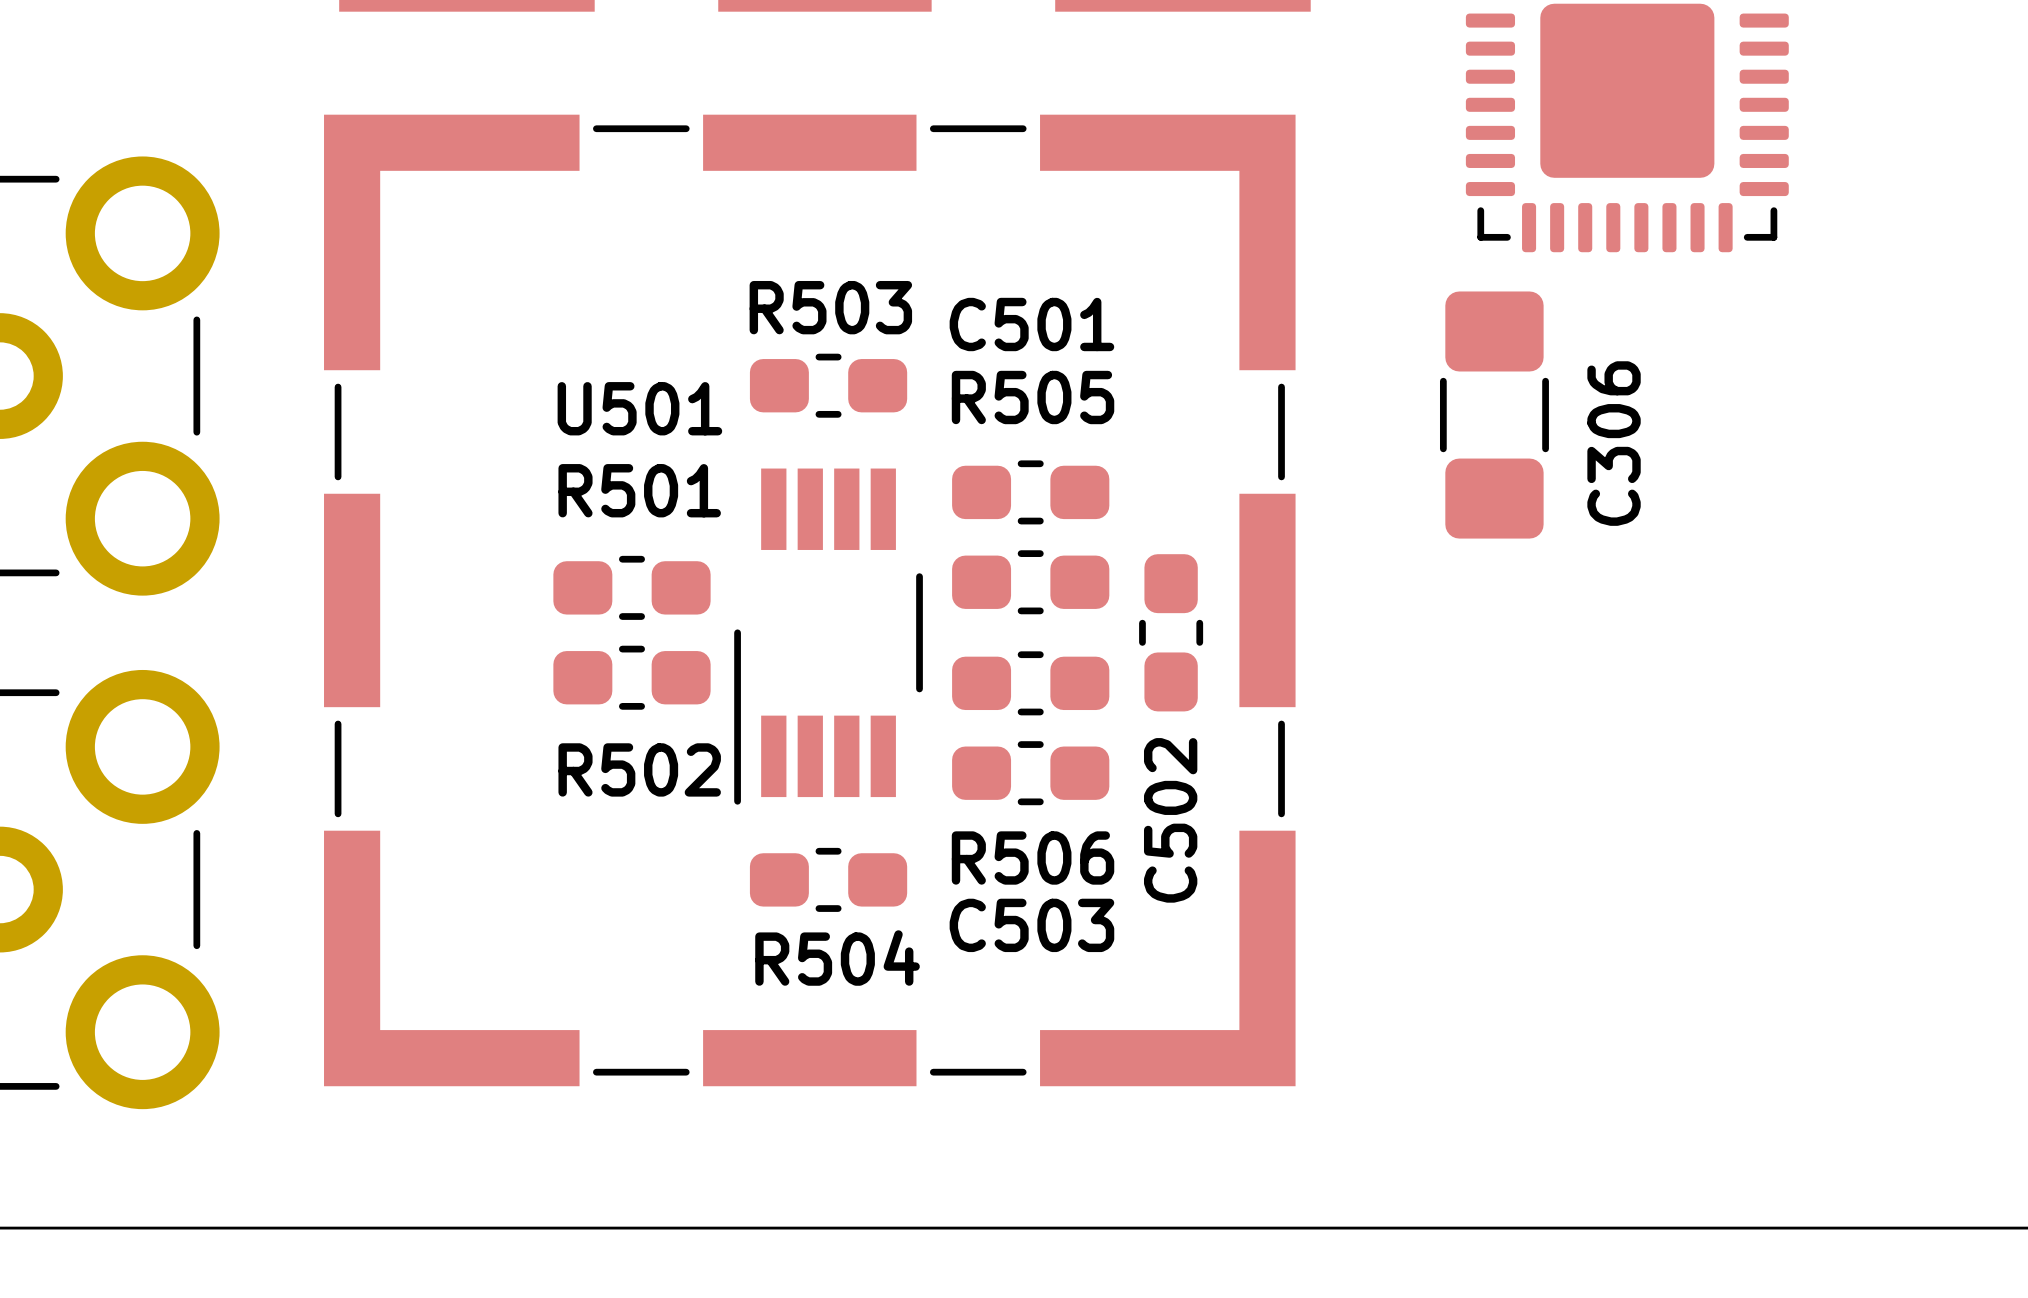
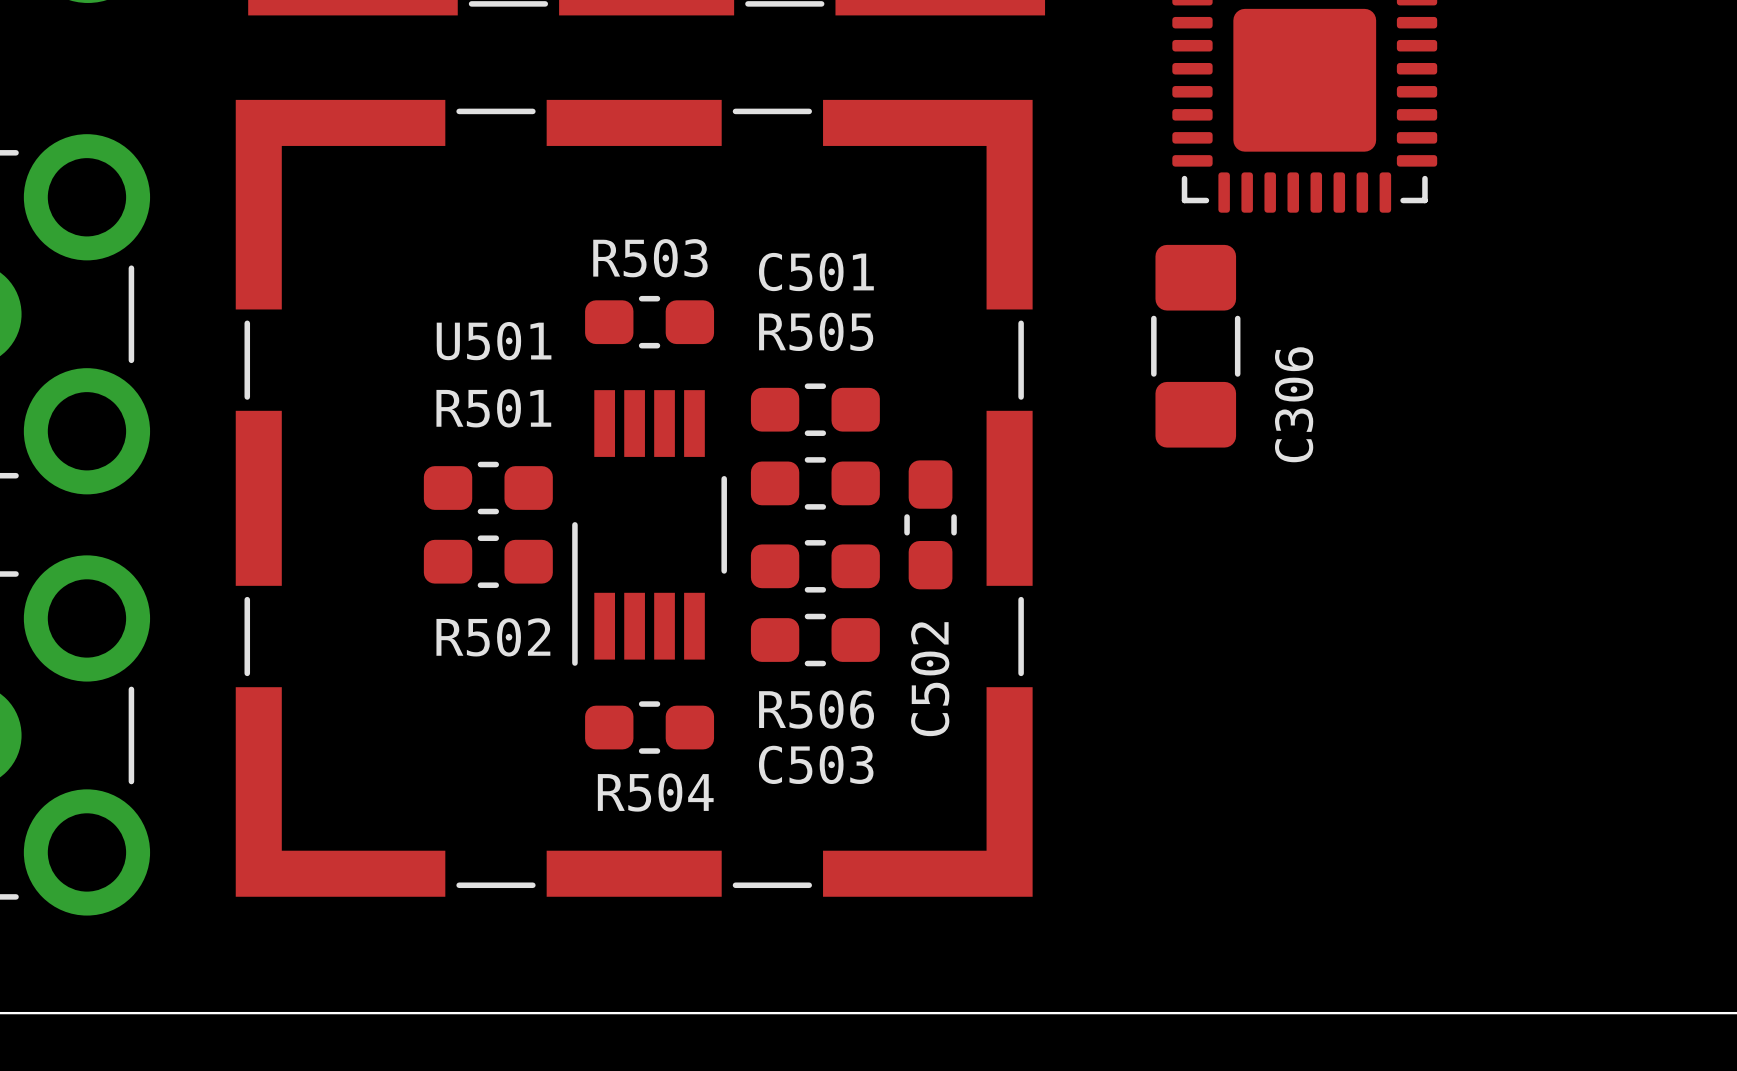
C306 name position: C306 (1614, 443) -> C306 (1294, 404)

